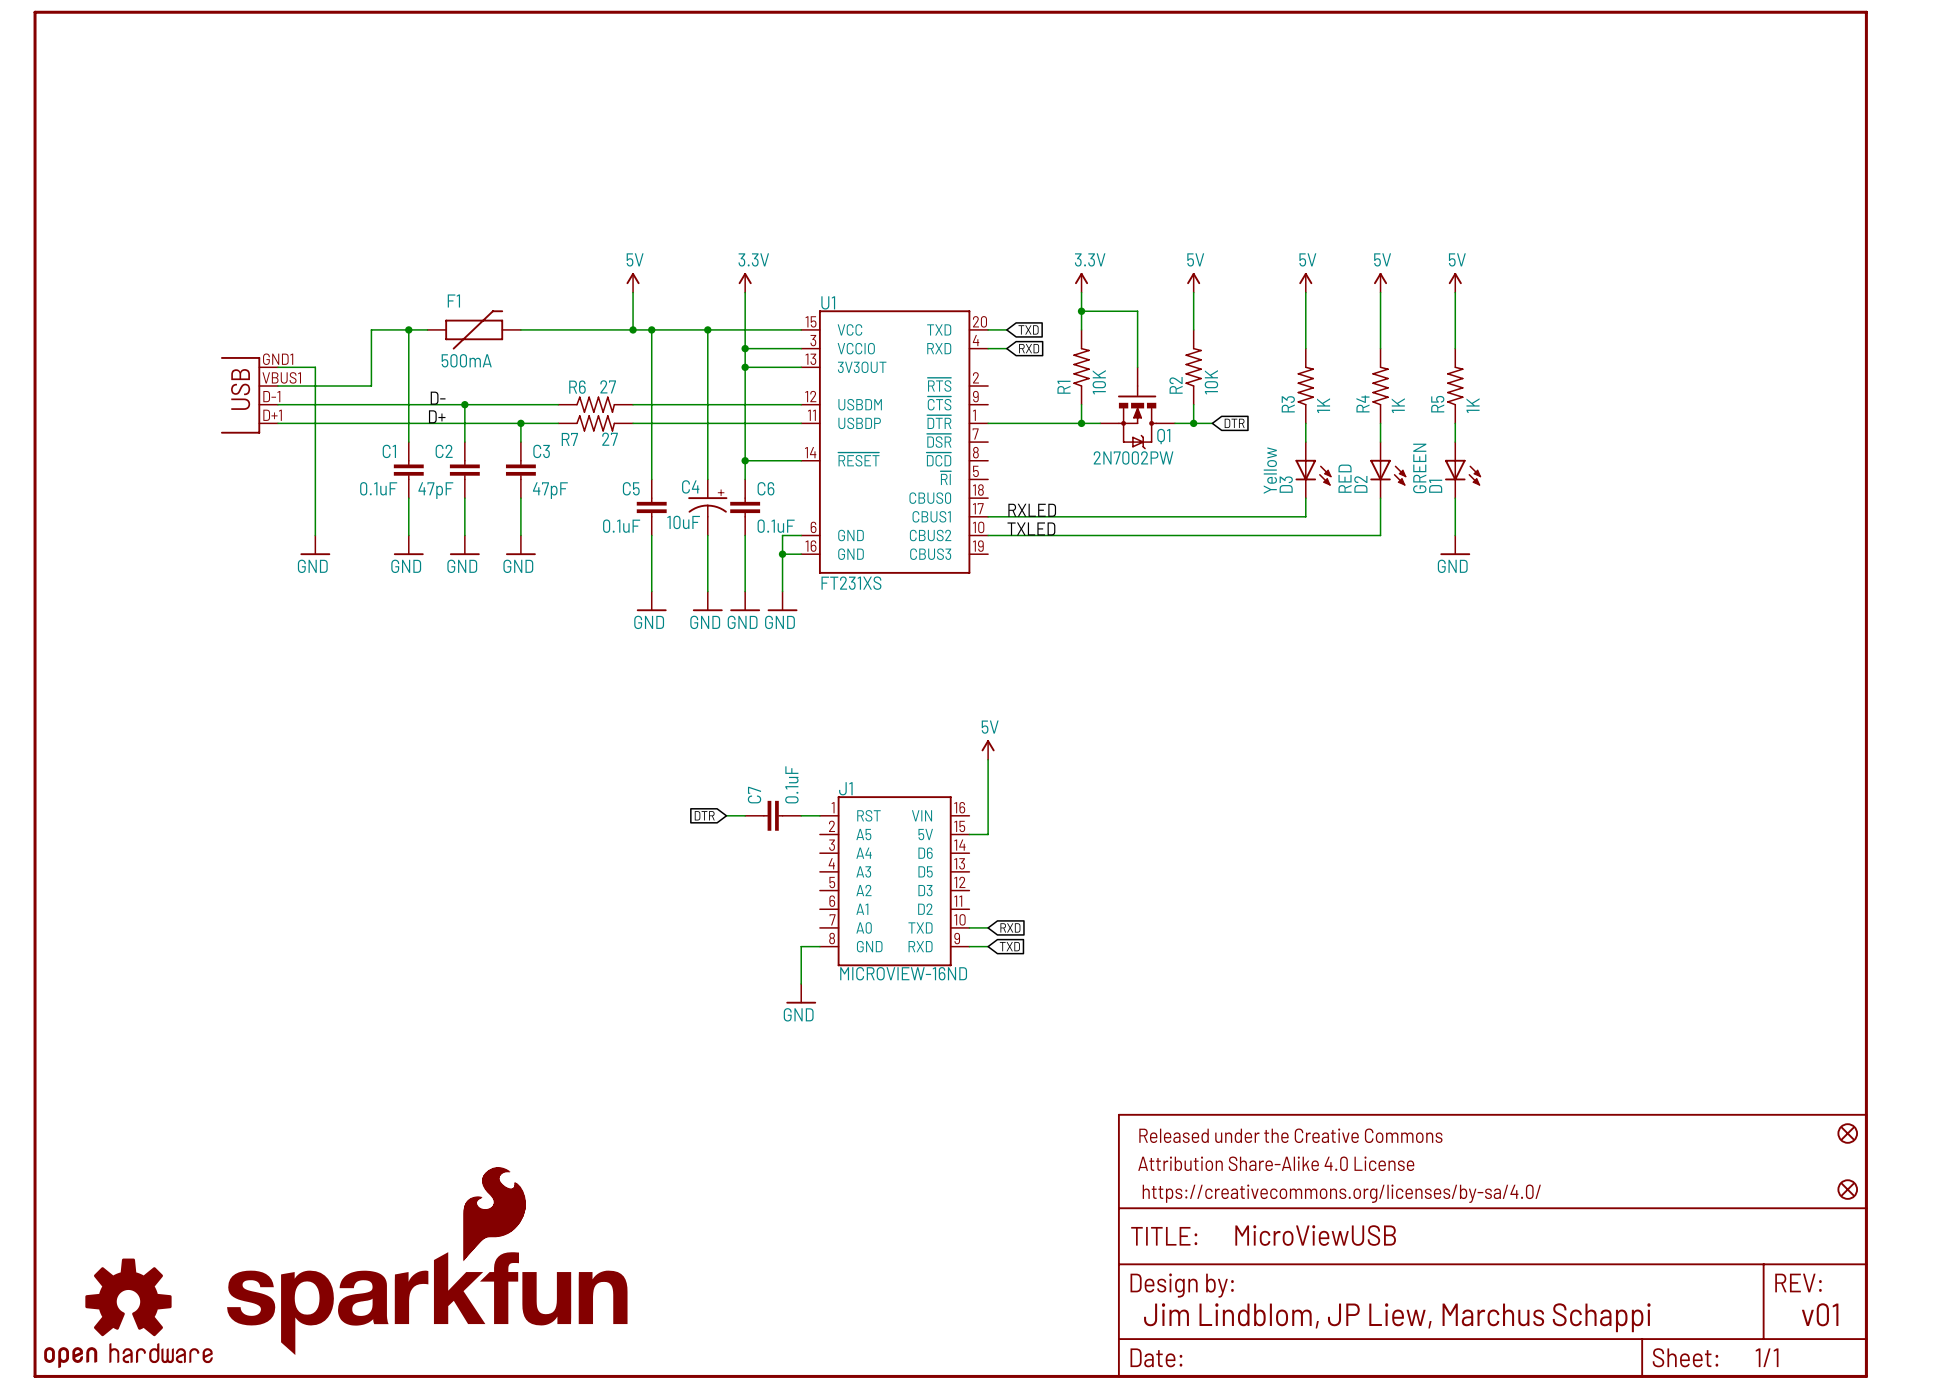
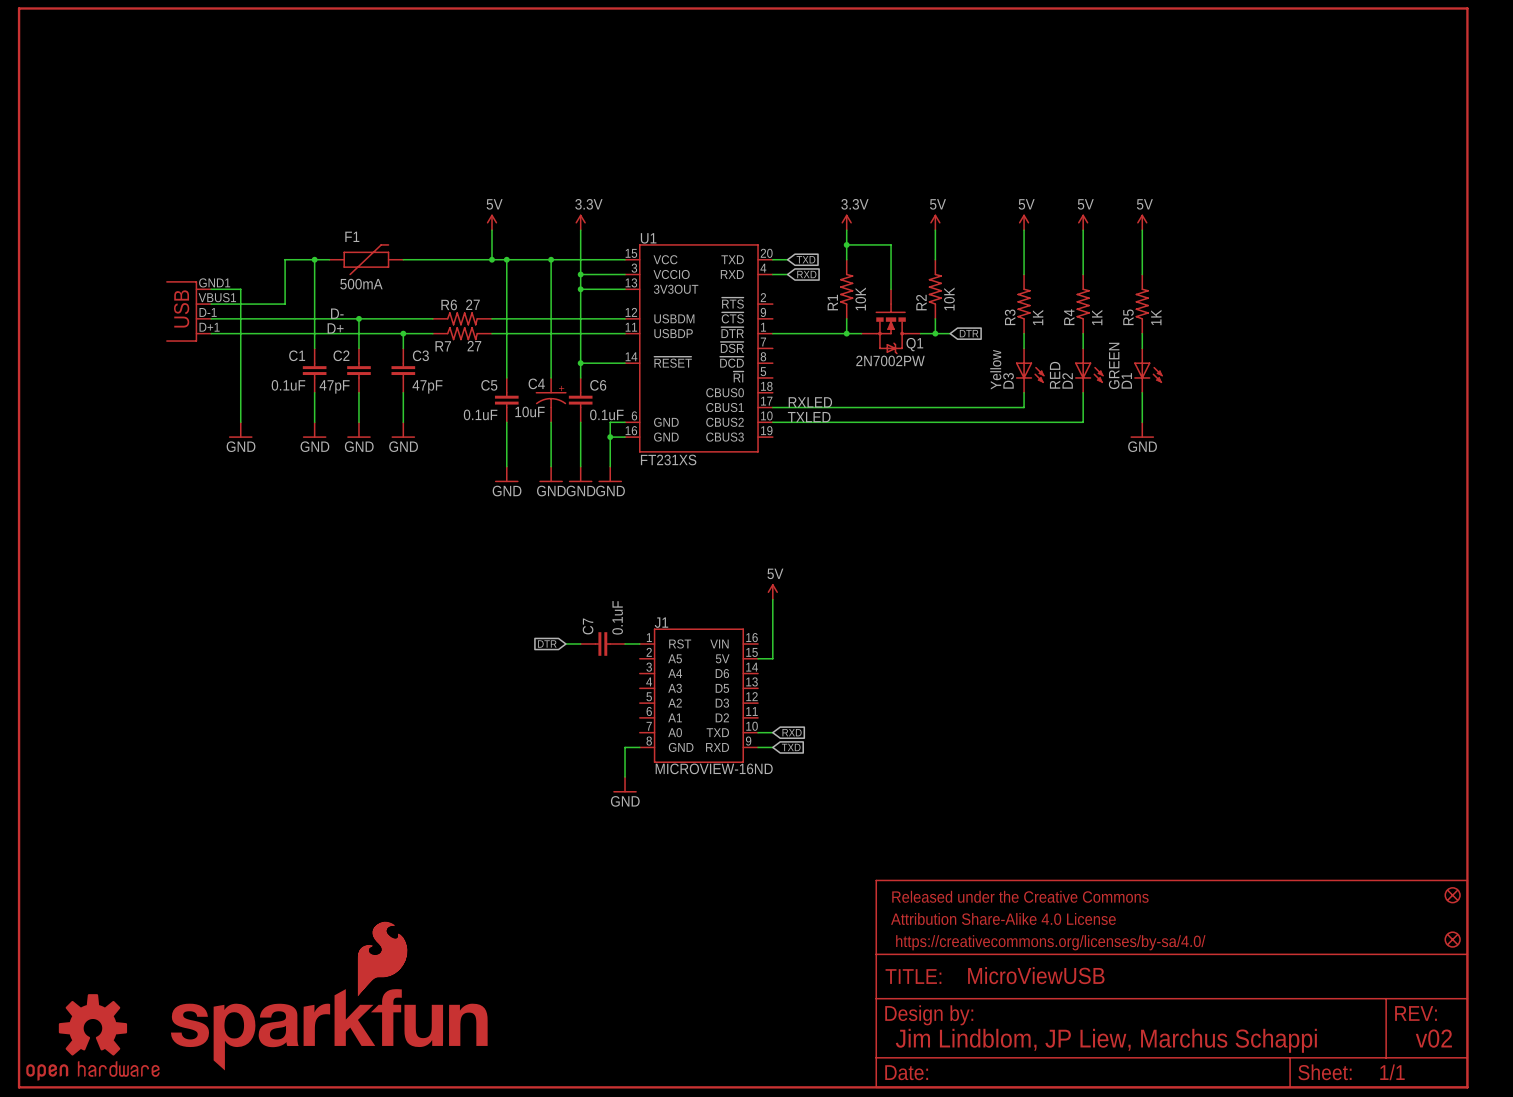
text: v01 (1820, 1314) -> v02 (1433, 1038)

